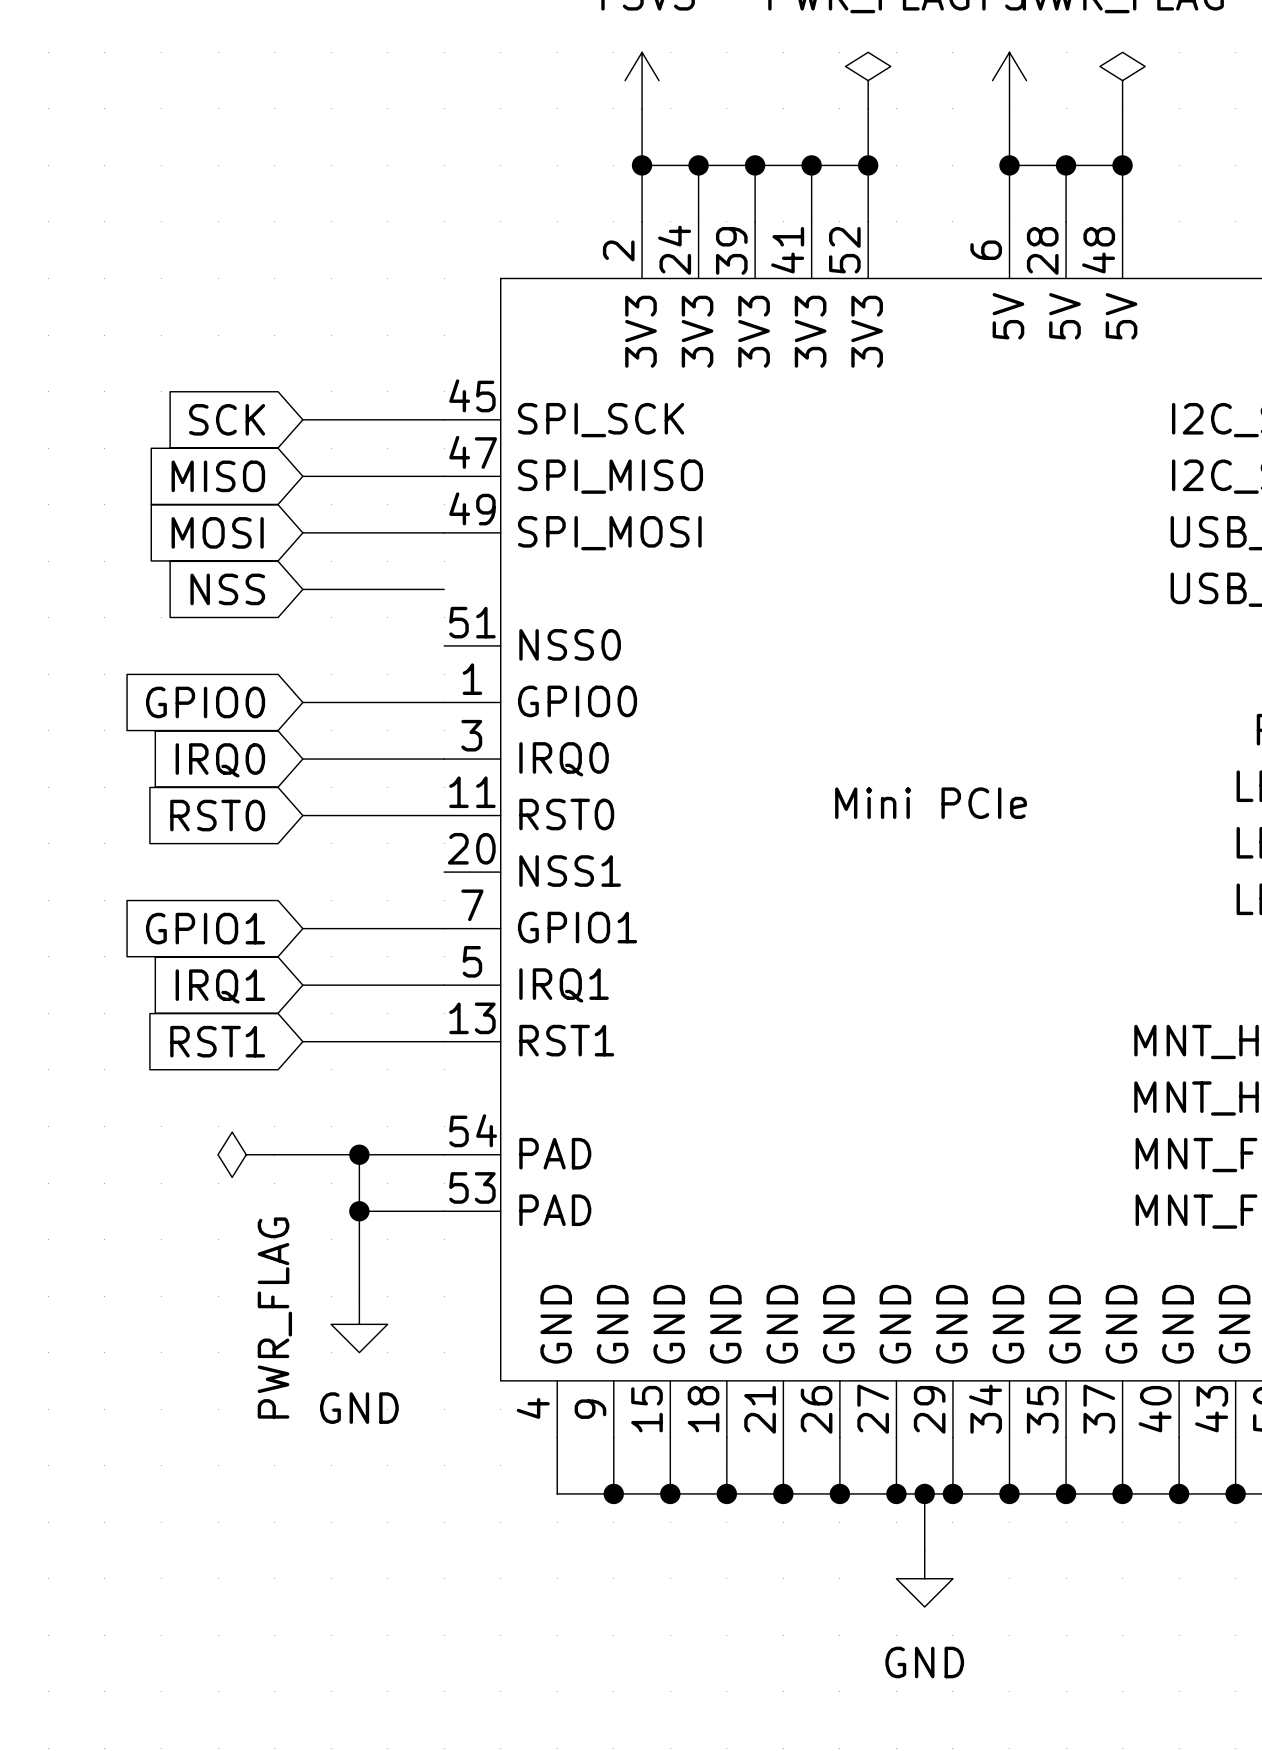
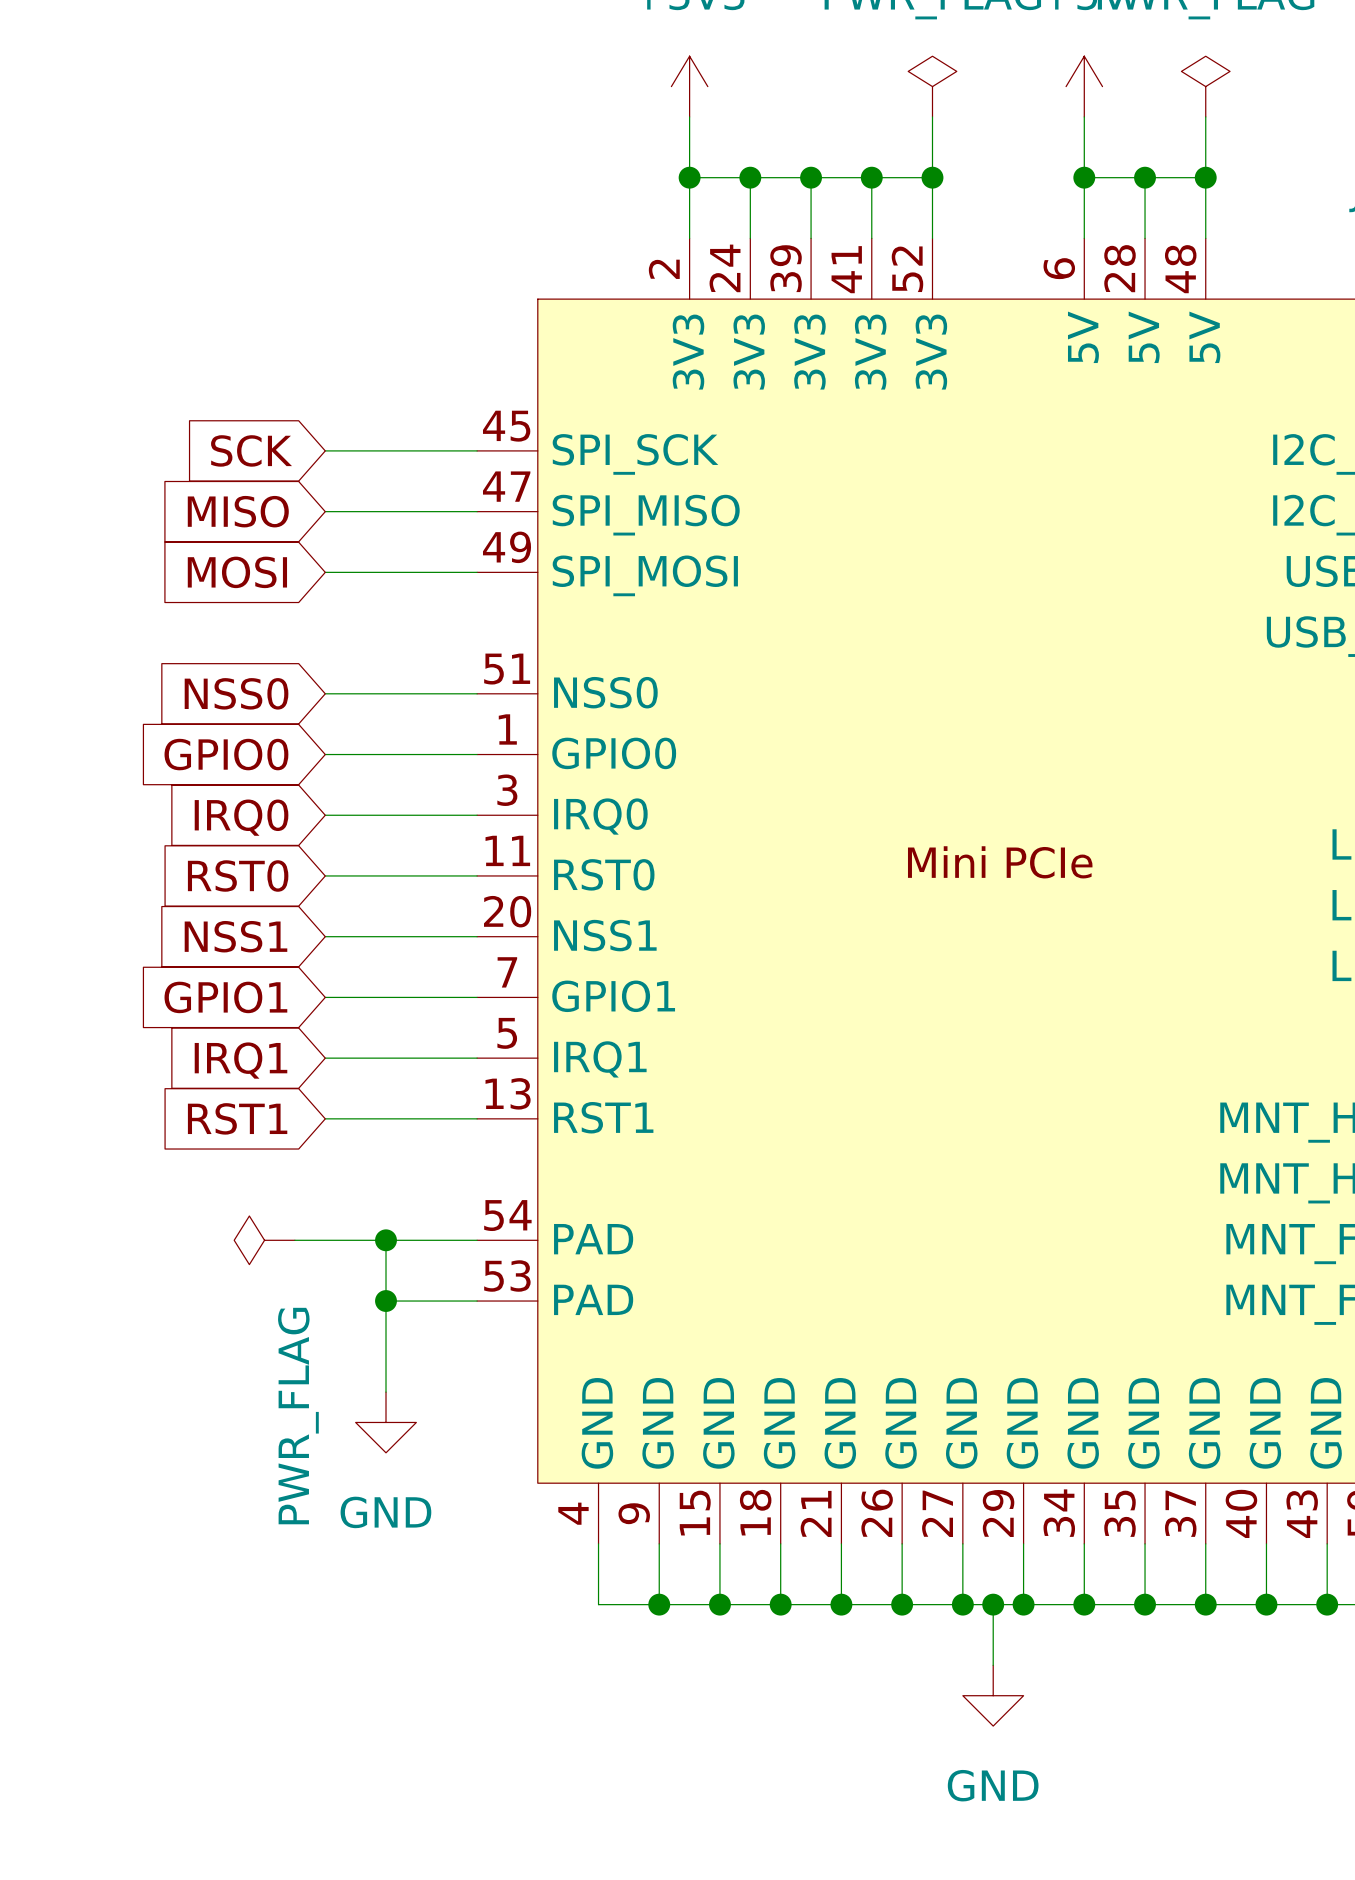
global label: NSS (227, 589) -> NSS0 (236, 693)
wire: (302, 589) (444, 589) -> (325, 693) (477, 693)
global label: none -> NSS1 (235, 936)
wire: none -> (325, 936) (477, 936)

